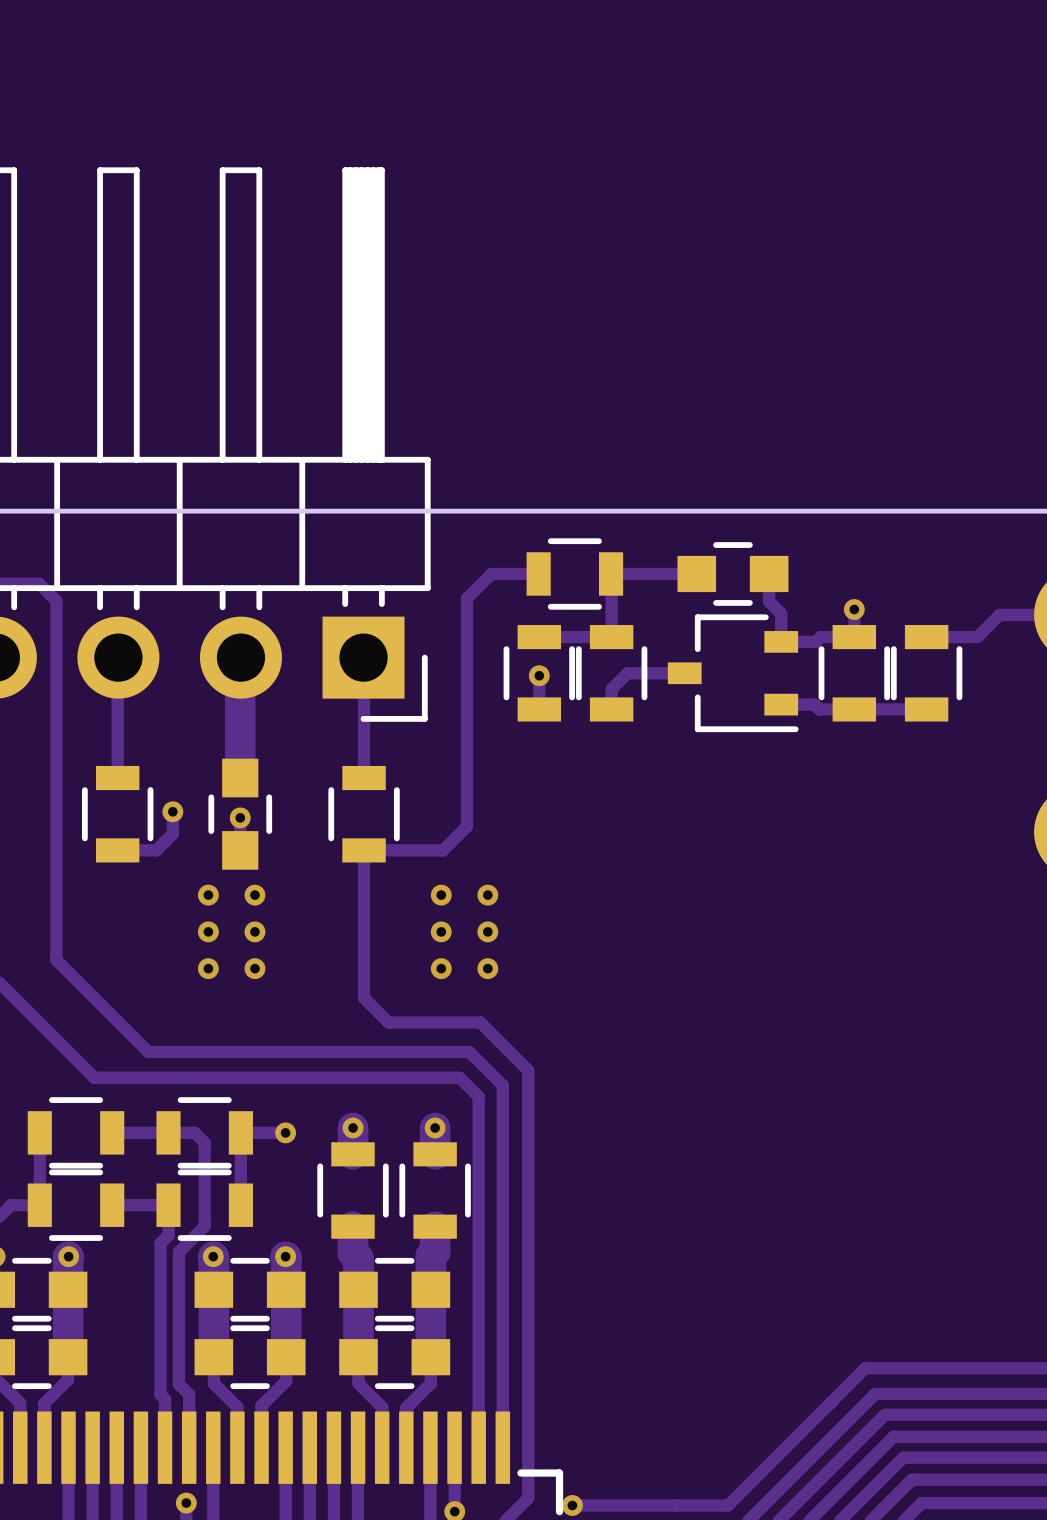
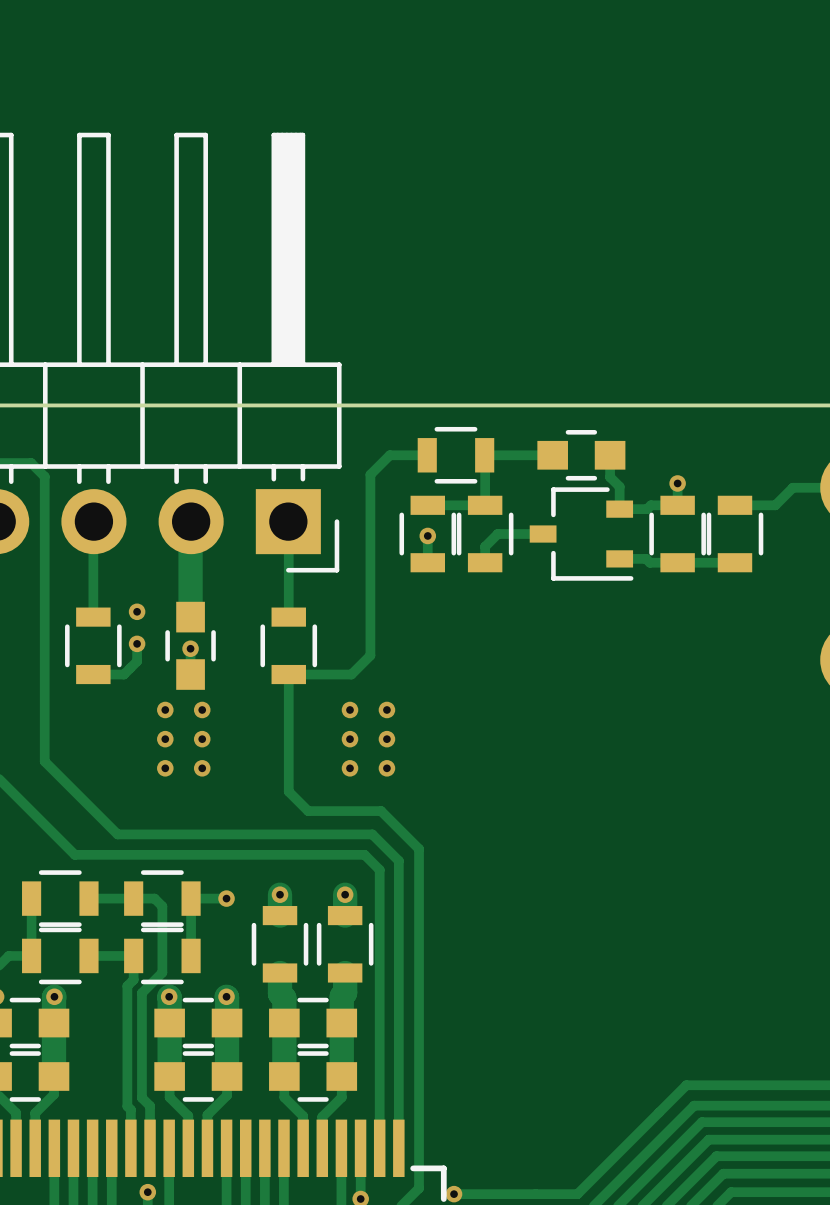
via: none -> (137, 611)

